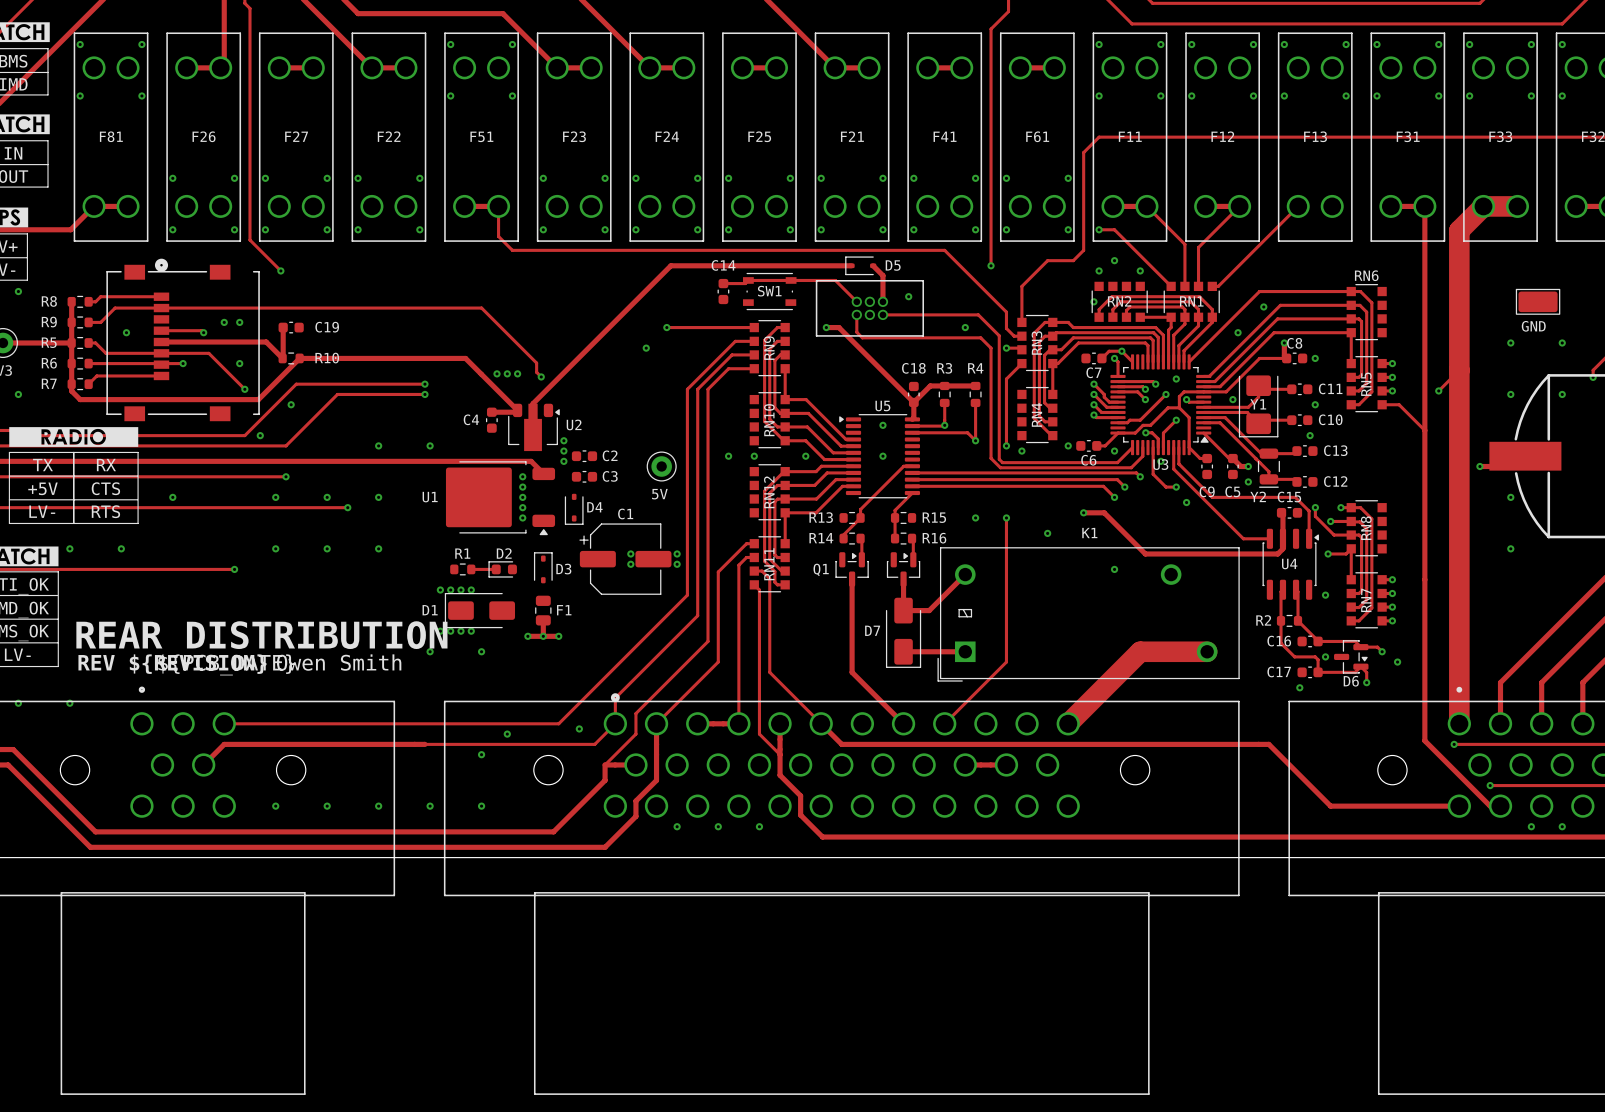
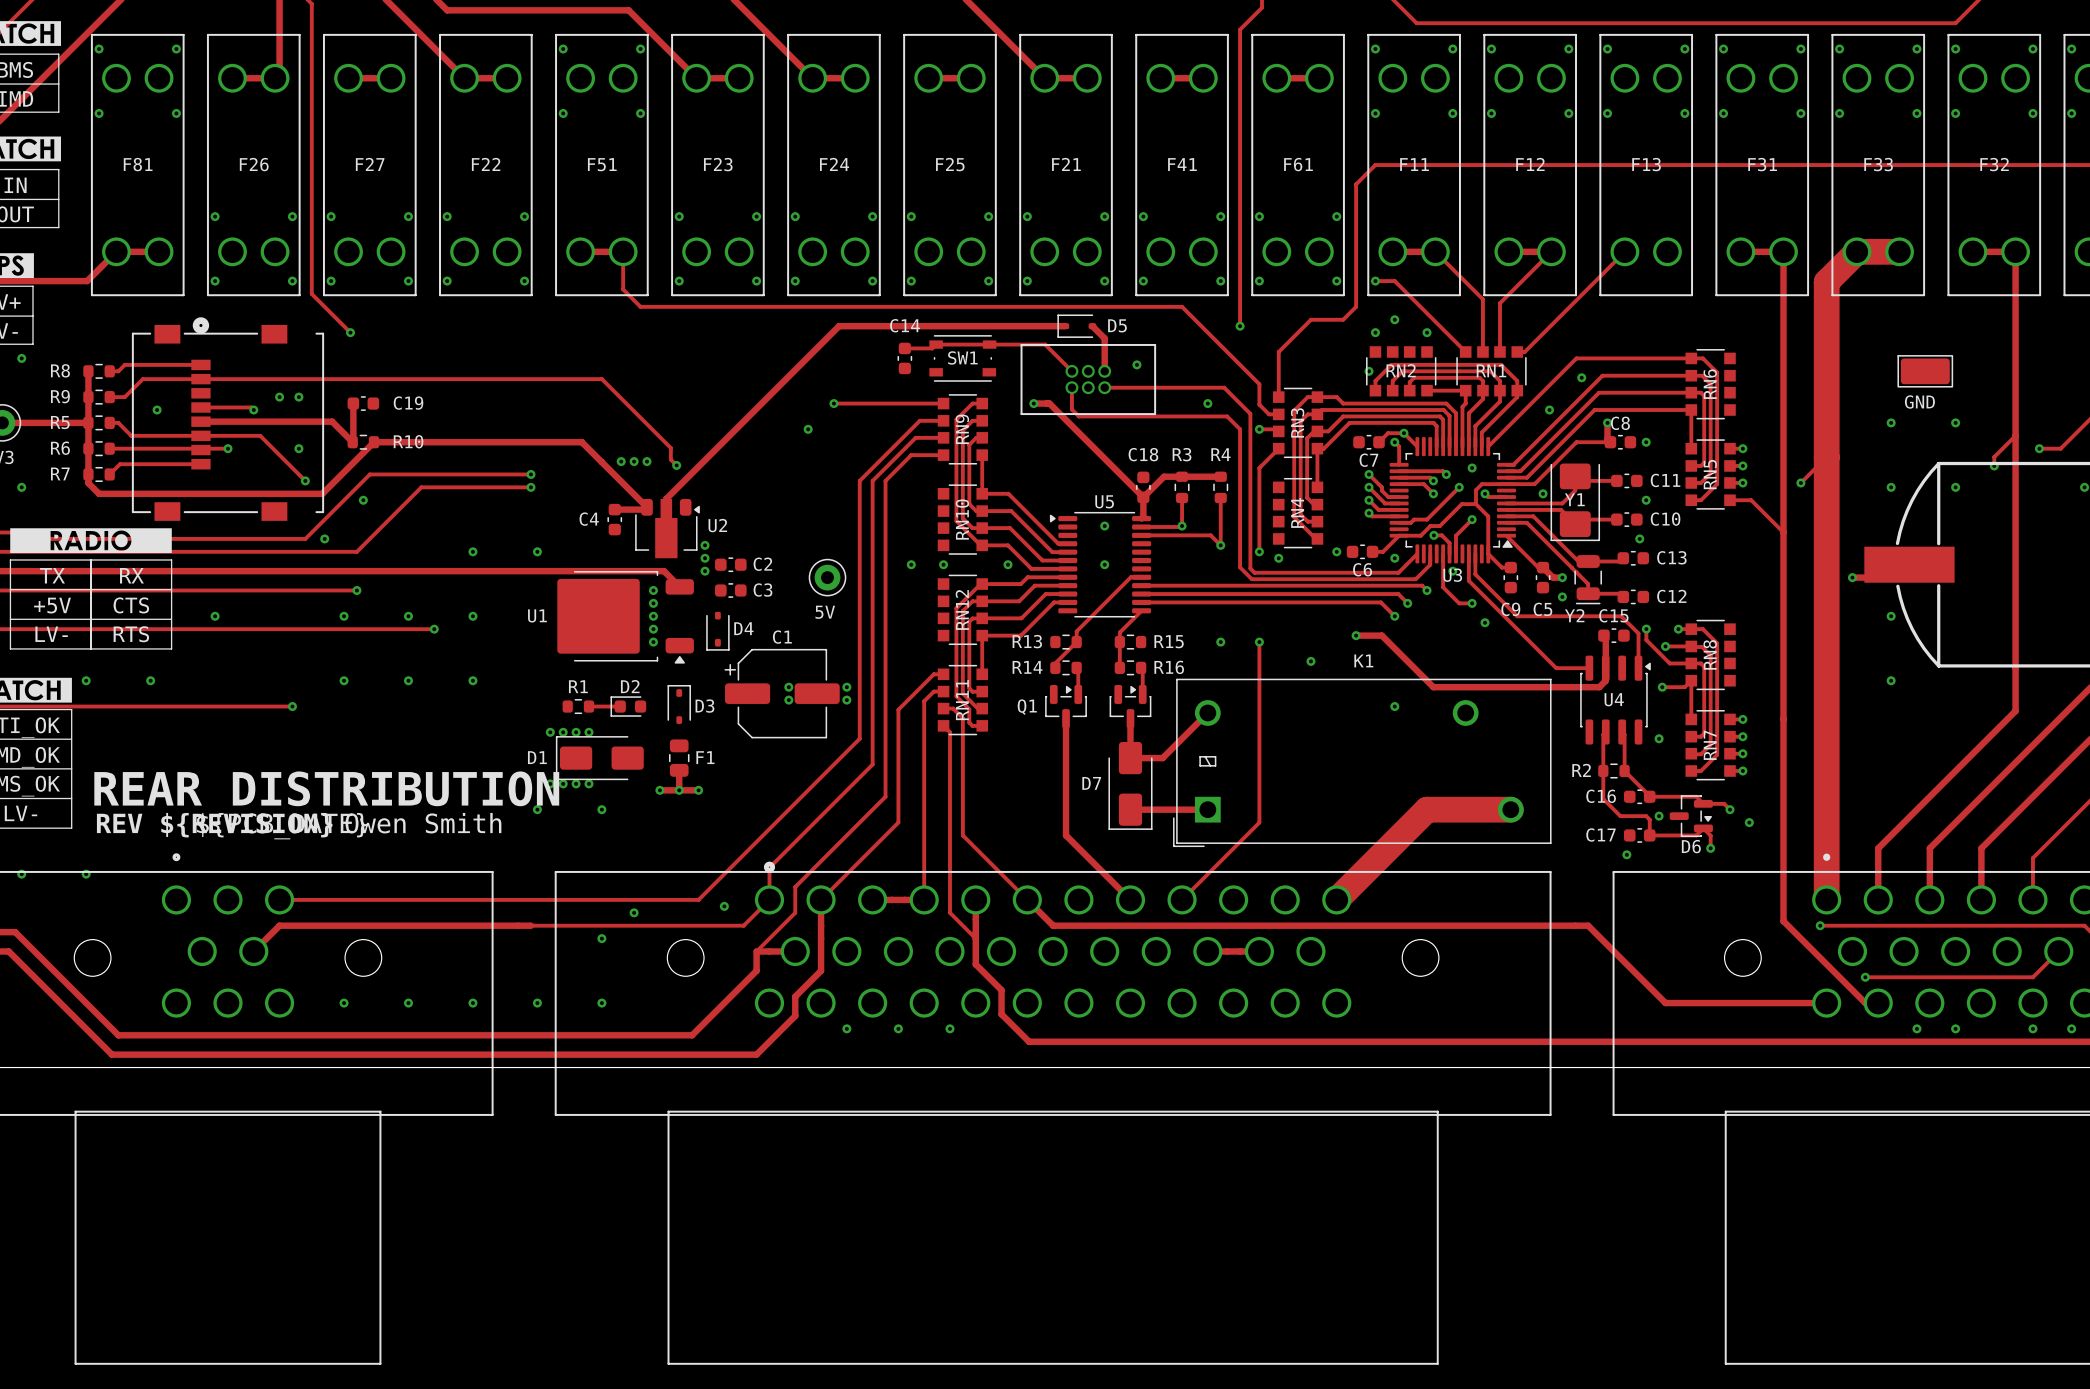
RN6 name rotation: 0° (1366, 275) -> 90° counterclockwise (1710, 384)

